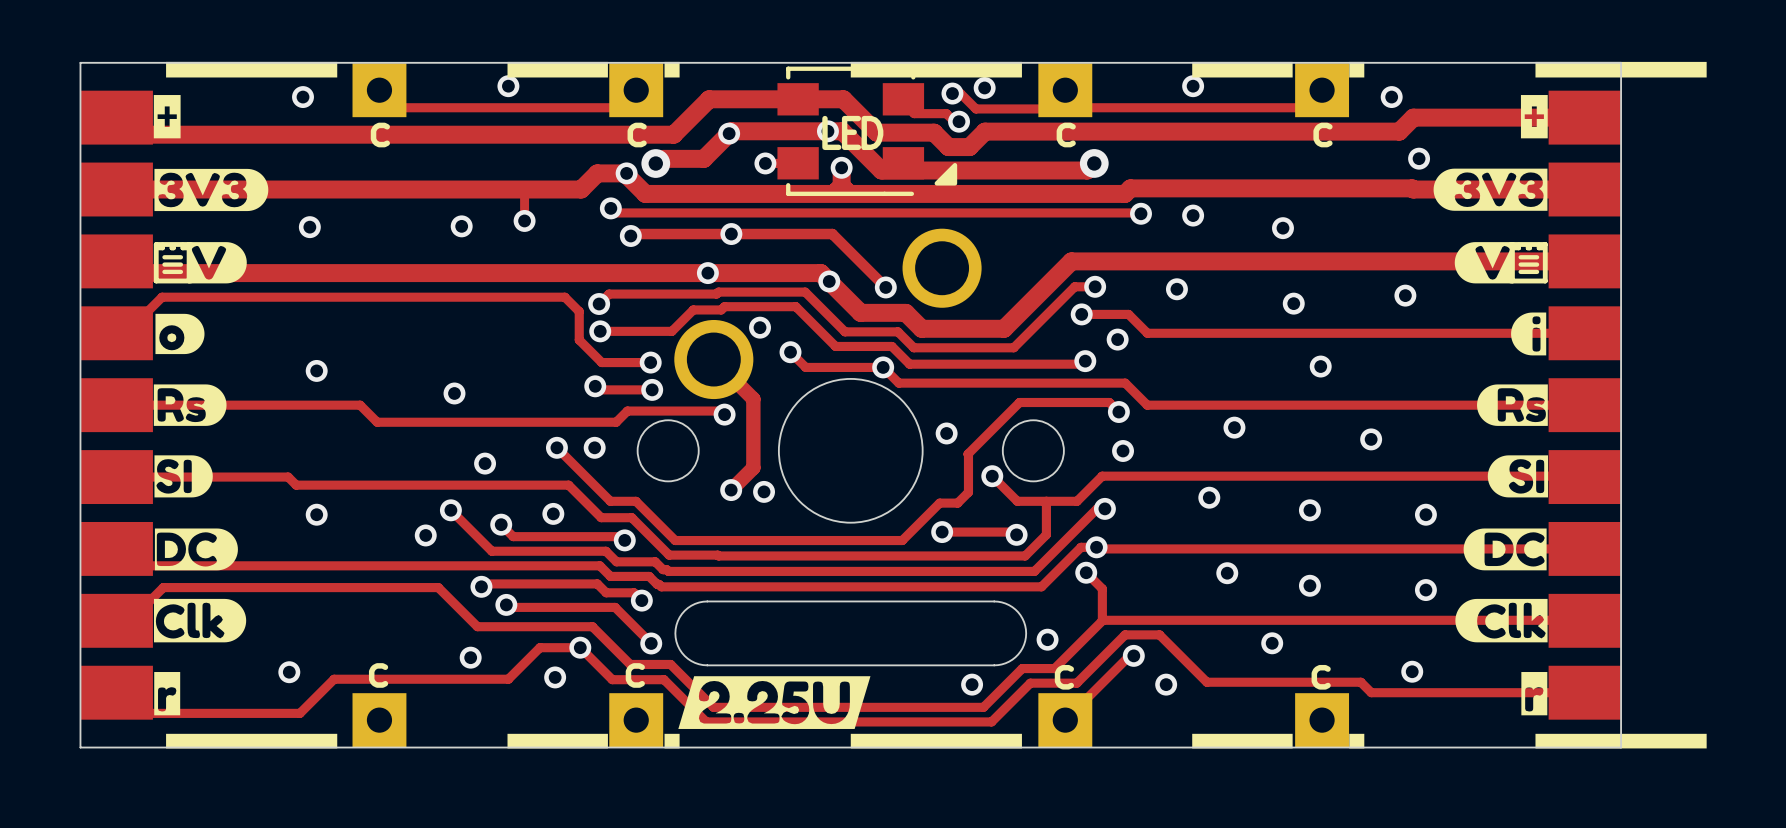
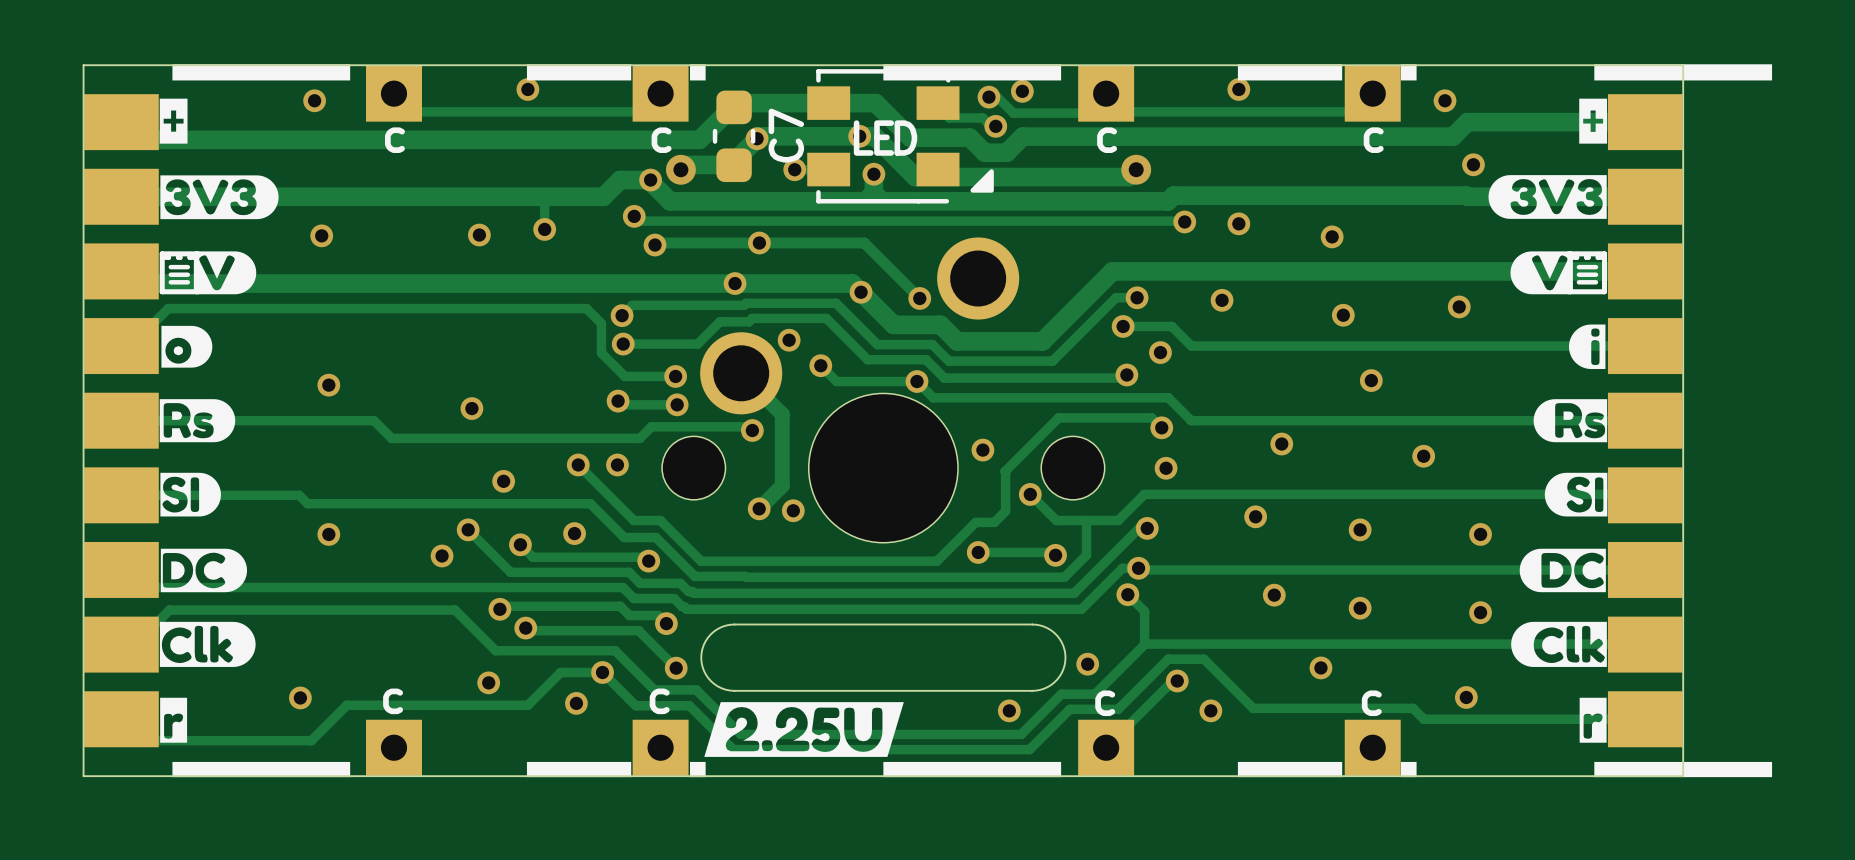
C7: none -> (734, 136)

